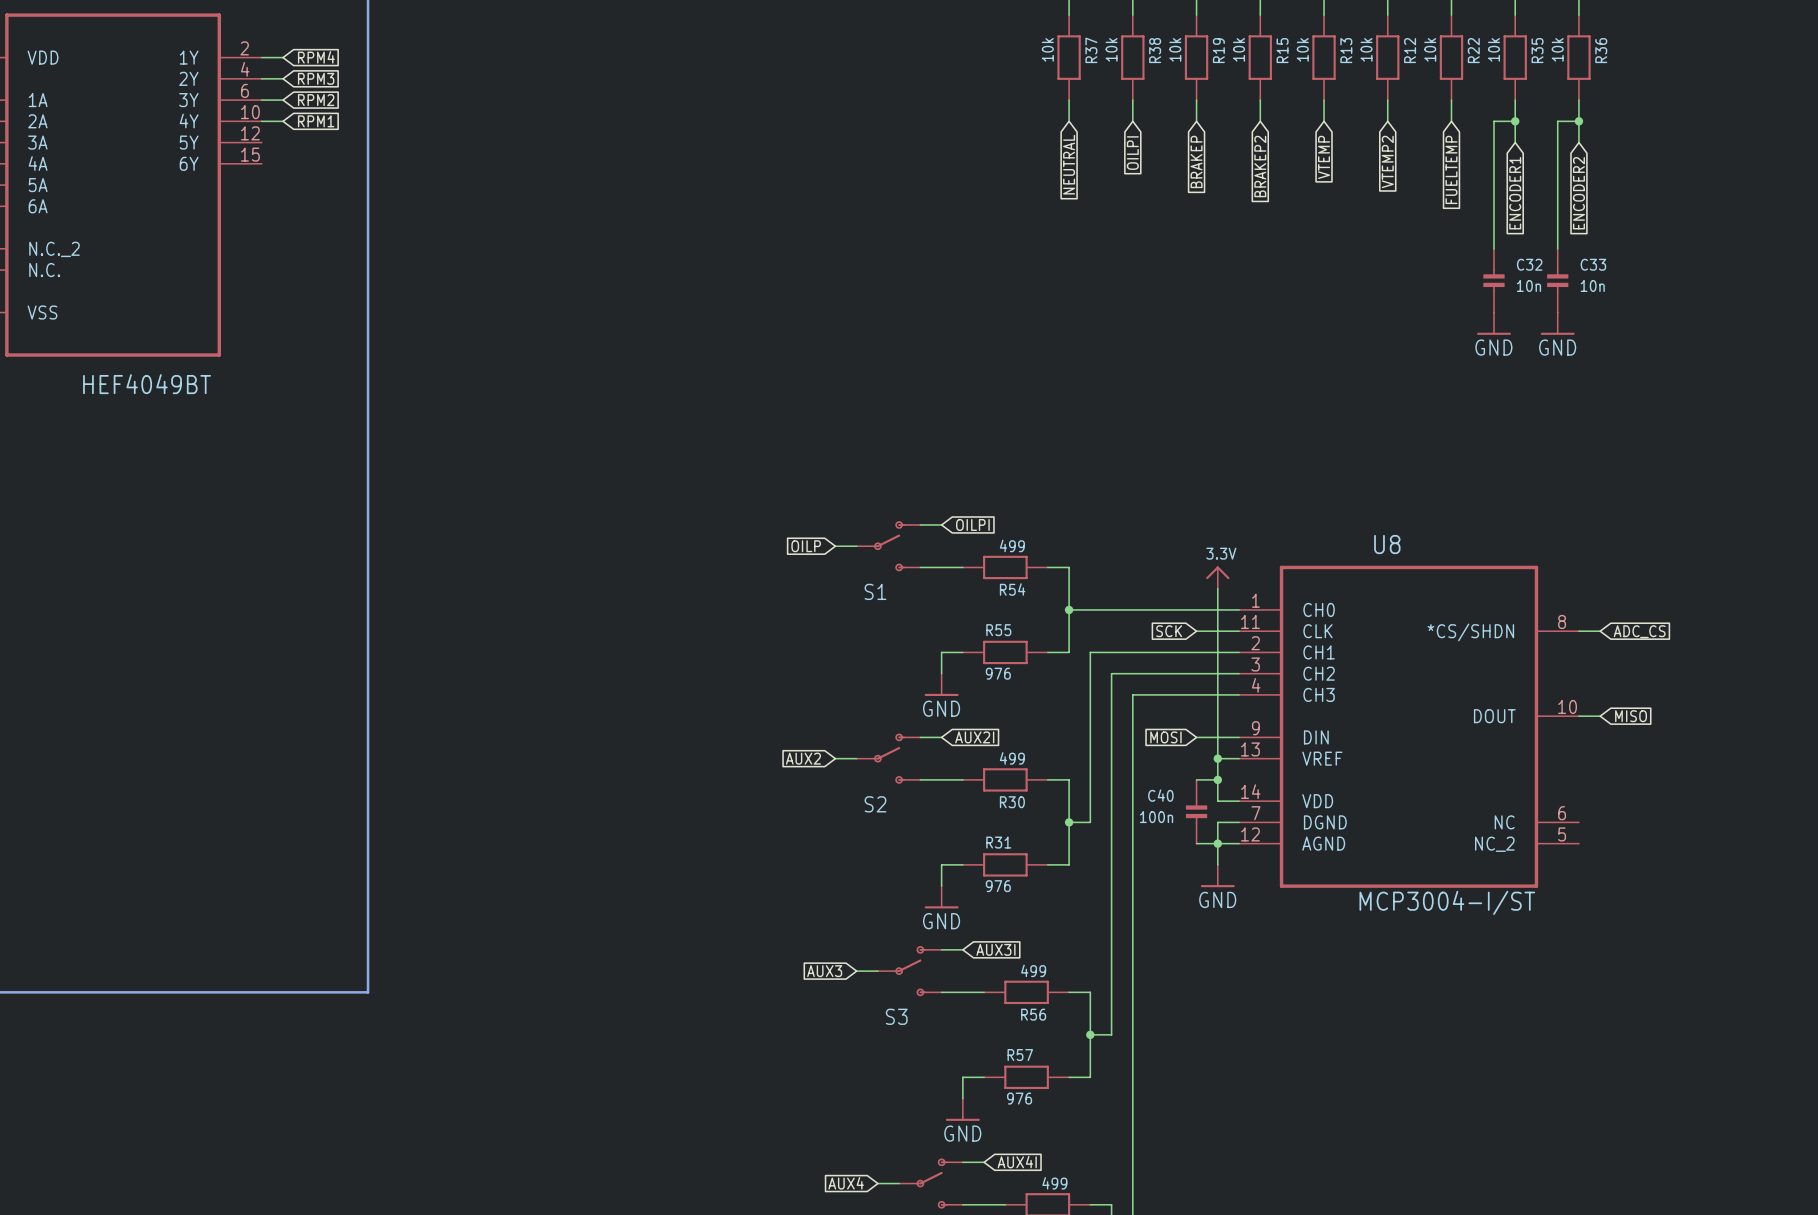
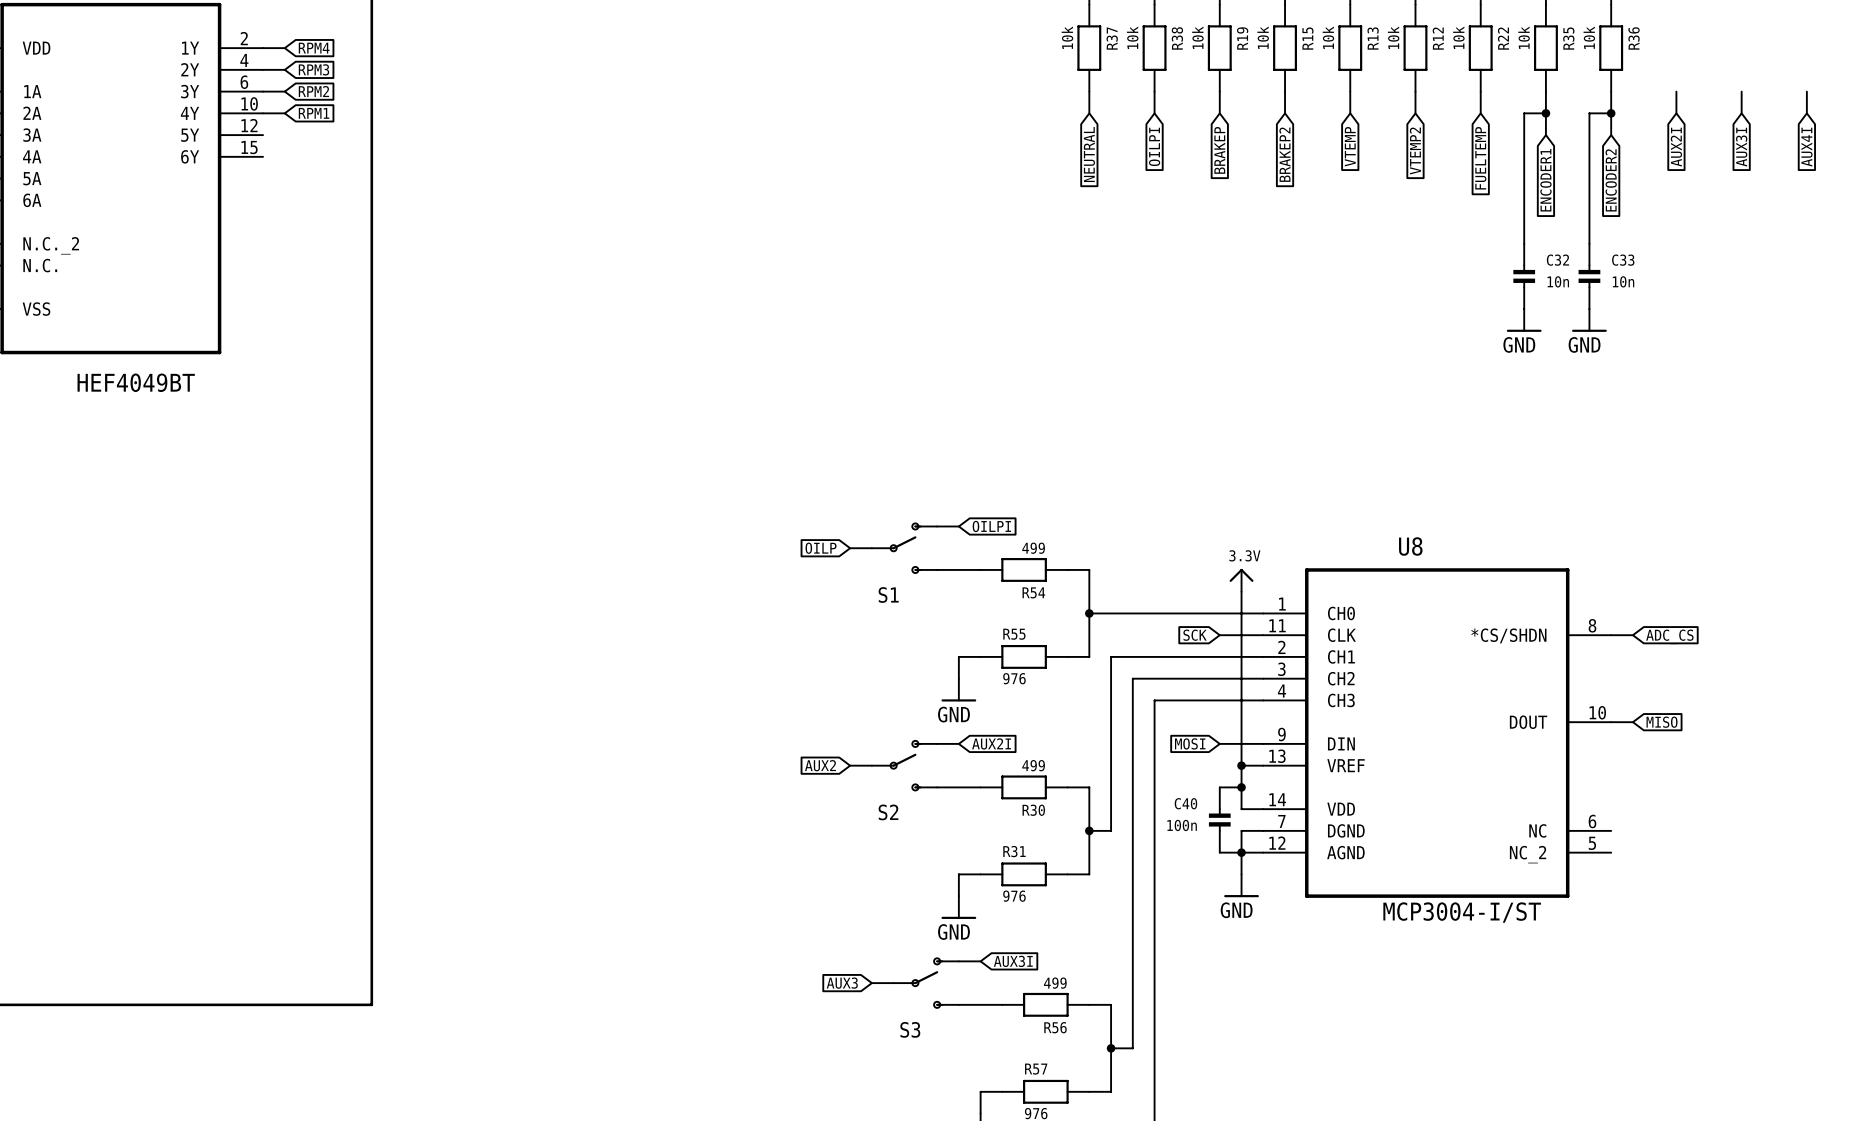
wire: none -> (1676, 91) (1676, 113)
wire: none -> (1741, 91) (1741, 113)
wire: none -> (1806, 91) (1806, 113)
global label: none -> AUX2I (1676, 147)
global label: none -> AUX3I (1741, 147)
global label: none -> AUX4I (1806, 147)

